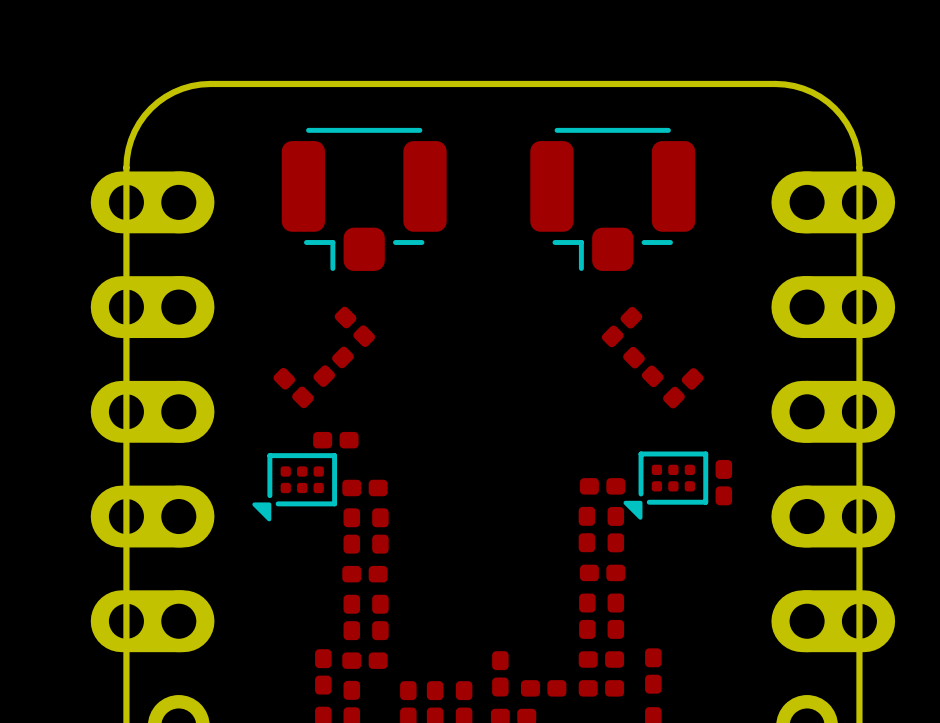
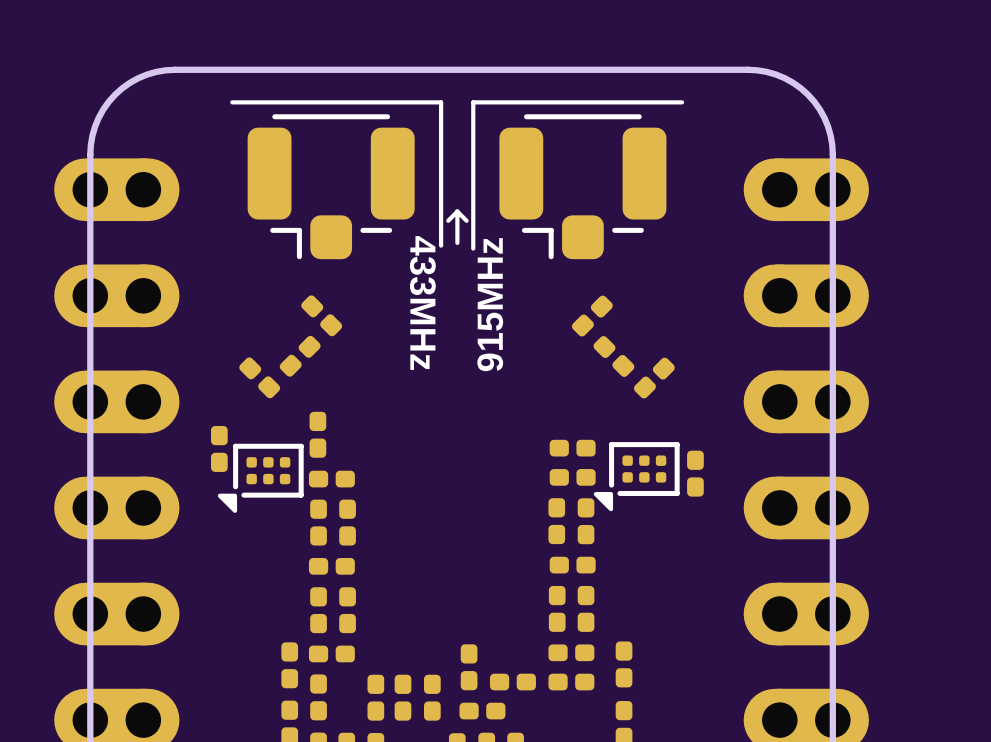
line: none -> (232, 102) (441, 102) (441, 245)
line: none -> (682, 102) (473, 102) (473, 248)
line: none -> (457, 211) (448, 220)
line: none -> (457, 211) (466, 220)
line: none -> (457, 211) (457, 242)
text: none -> 433MHz (422, 303)
text: none -> 915MHz (490, 304)
part rotation: 0° (335, 440) -> 90° clockwise (317, 434)
part: none -> (572, 448)
part: none -> (219, 448)

